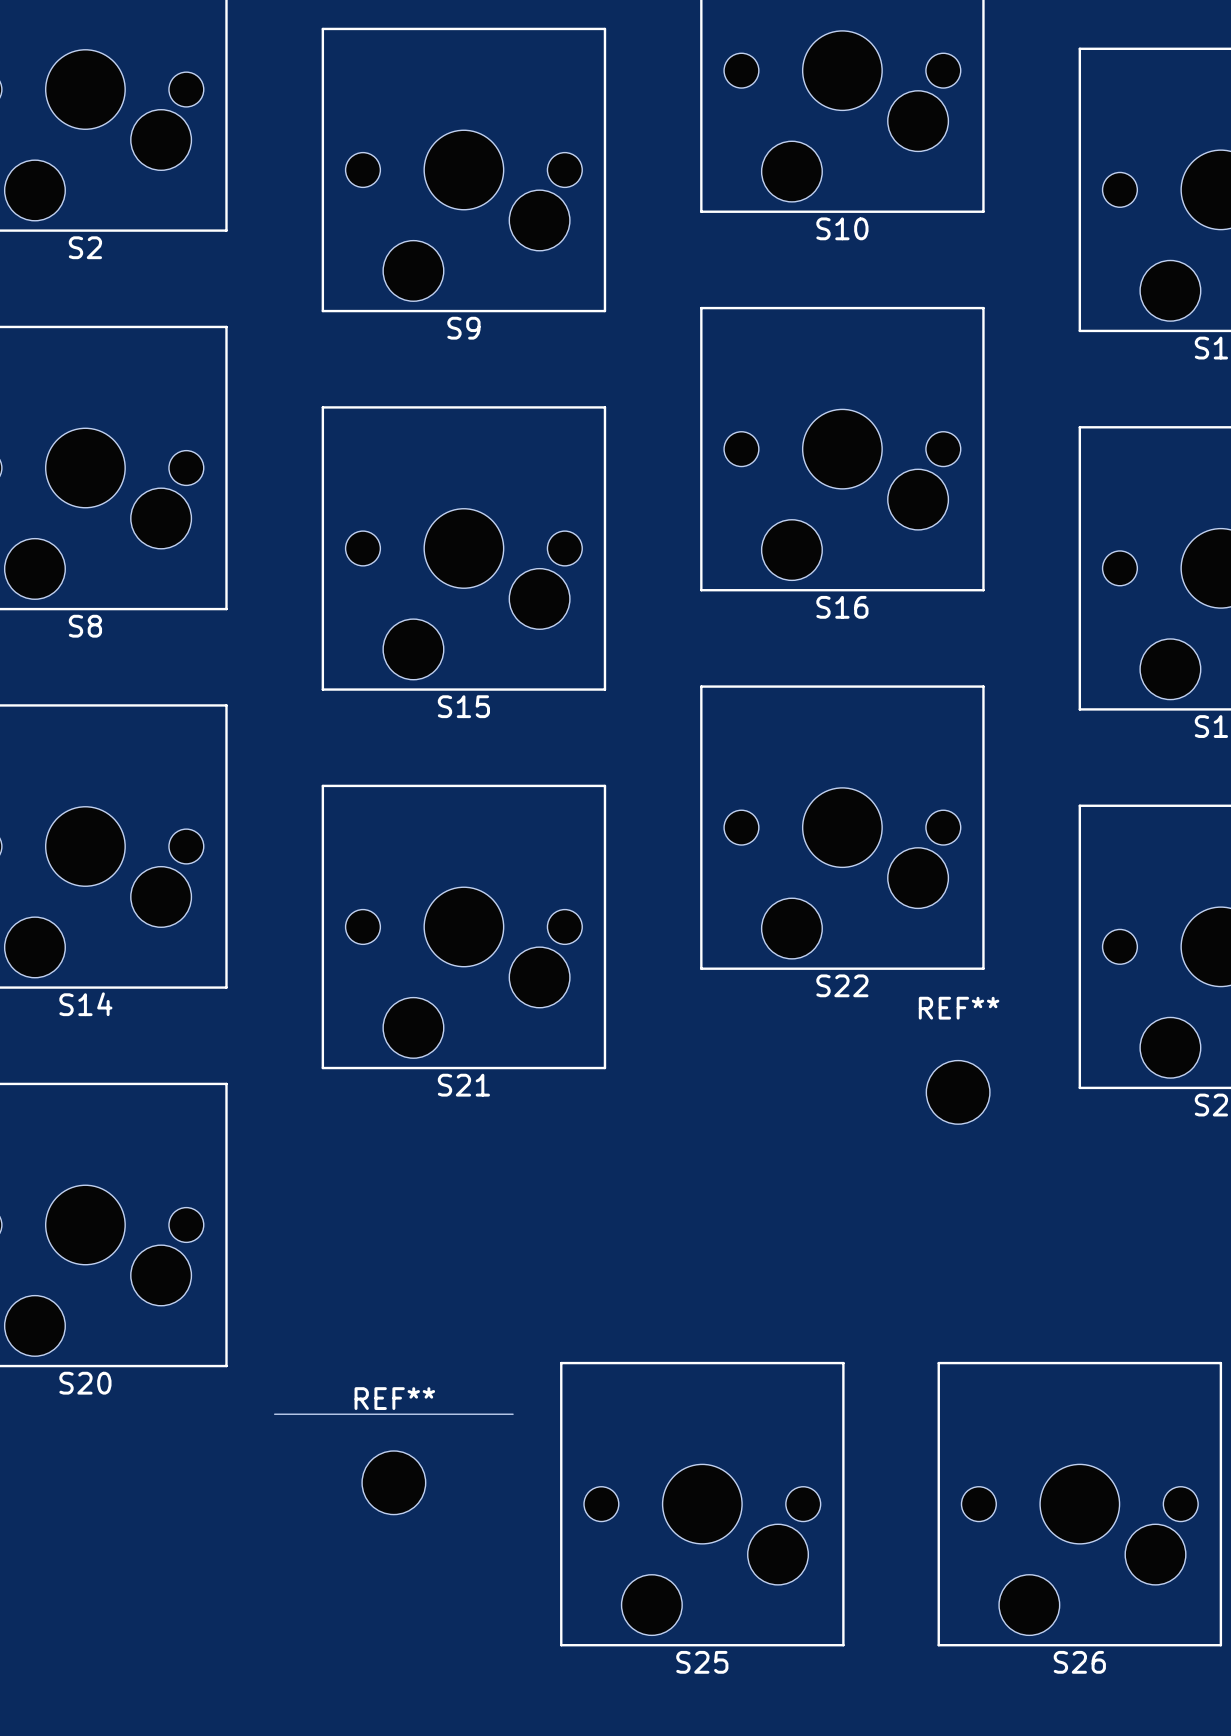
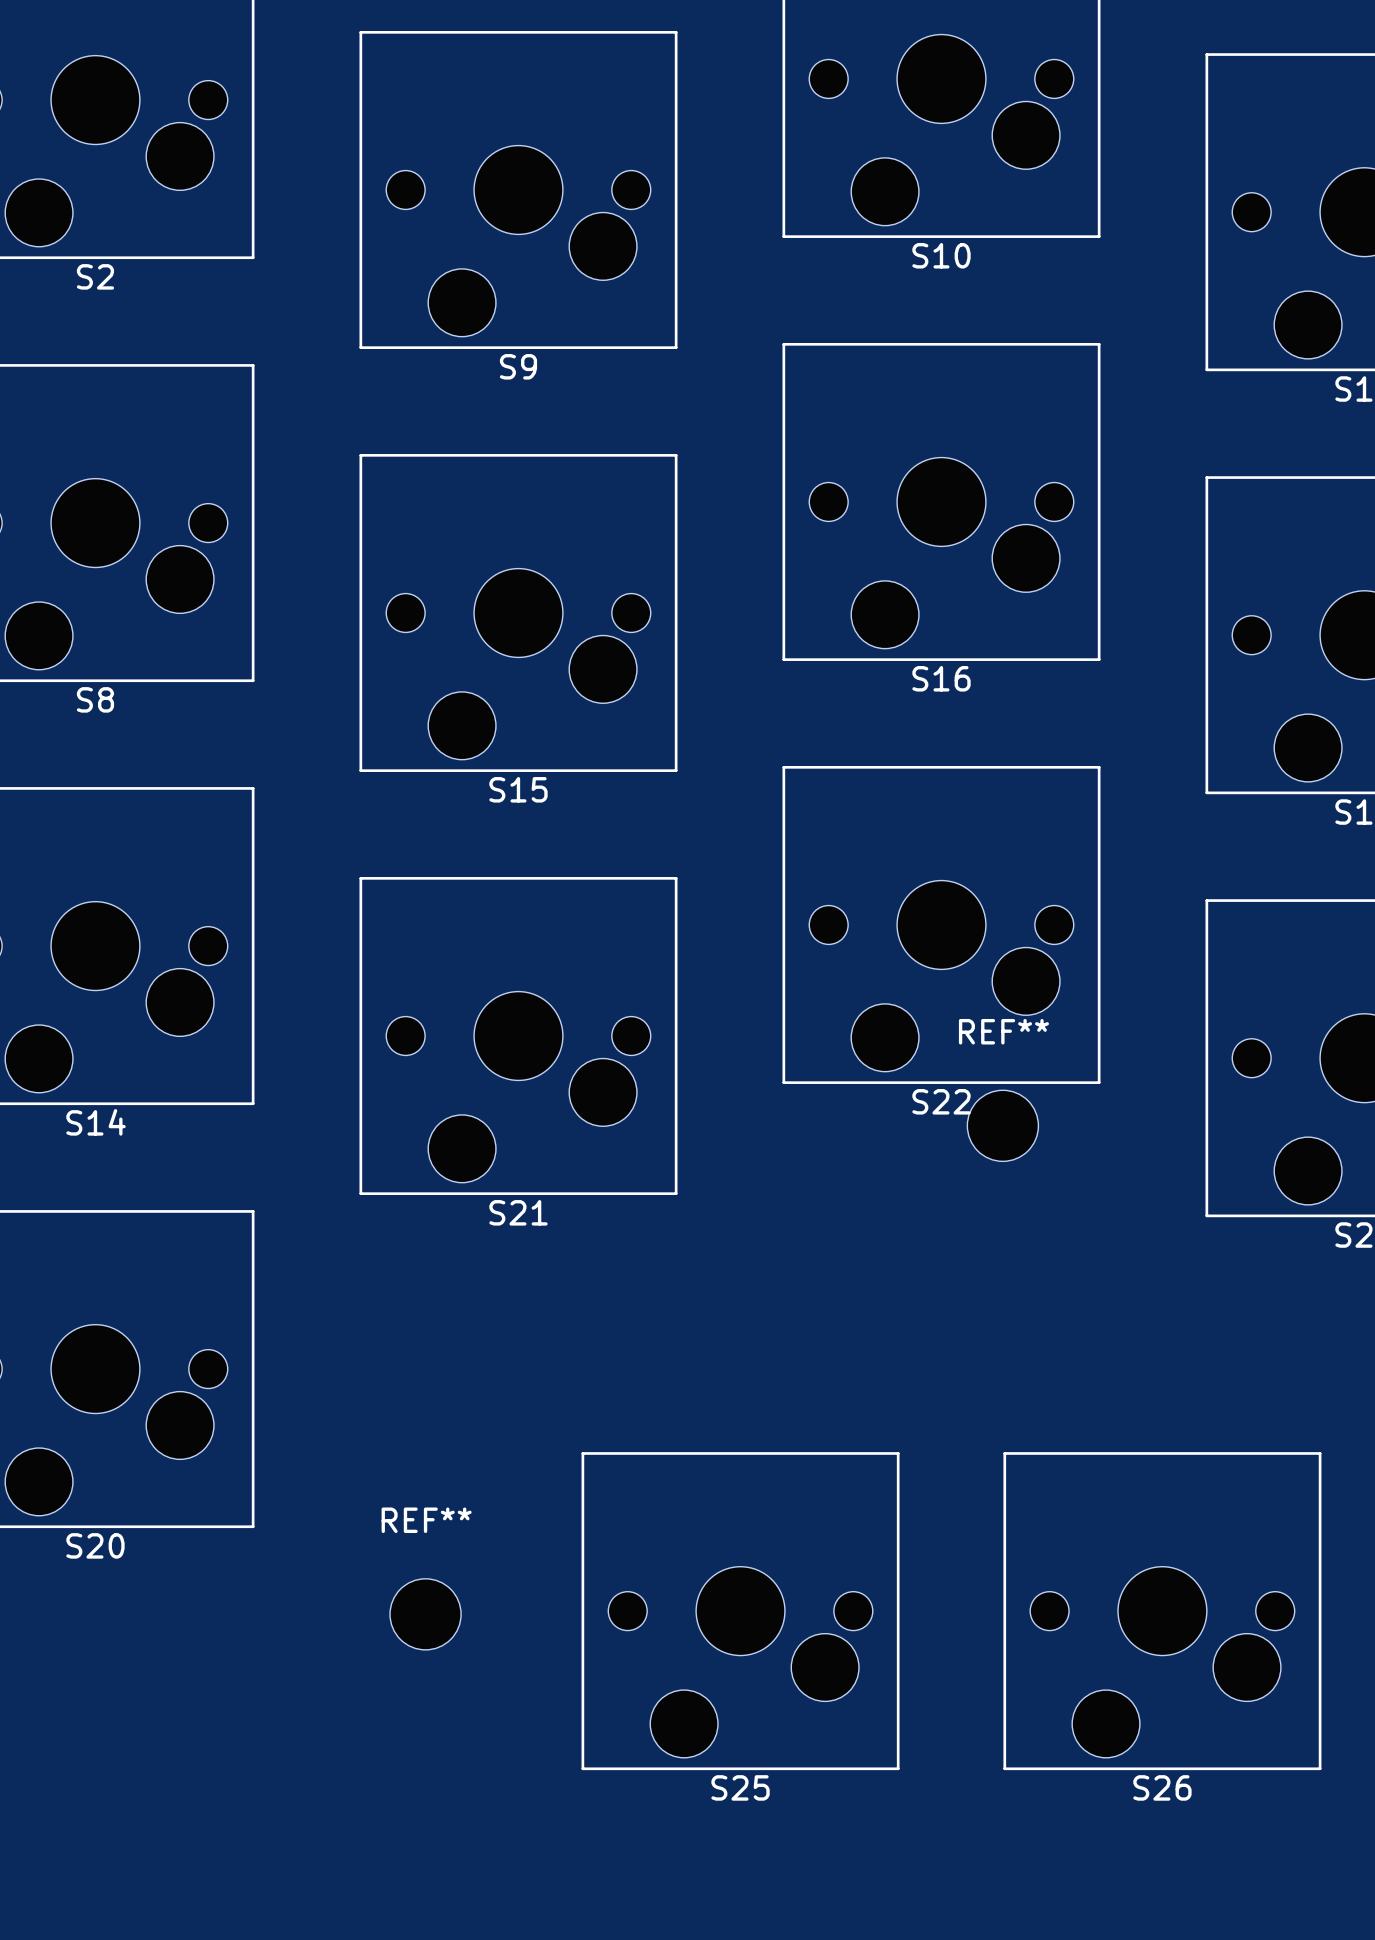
REF** position: (958, 1092) -> (1002, 1125)
board edge: (274, 1414) (513, 1414) -> none
REF** position: (393, 1482) -> (425, 1614)
S25 position: (702, 1504) -> (740, 1611)
S26 position: (1079, 1504) -> (1162, 1611)

